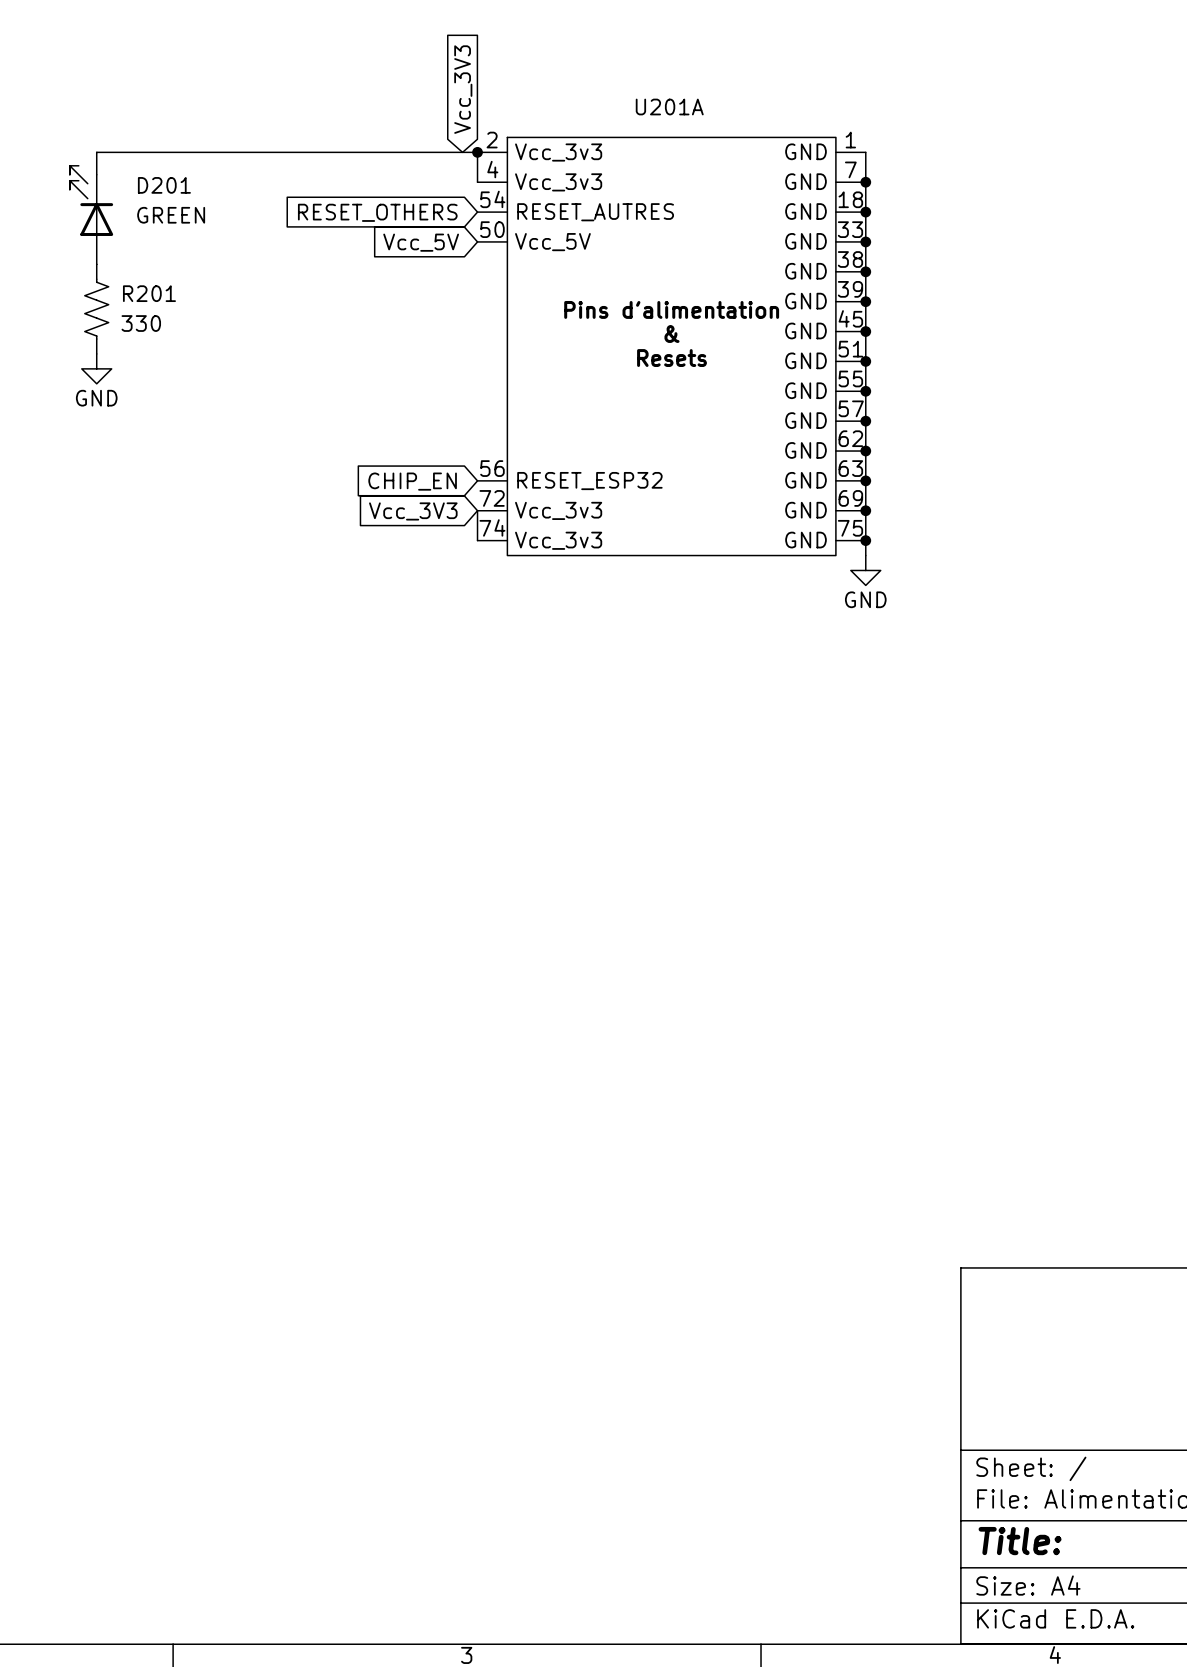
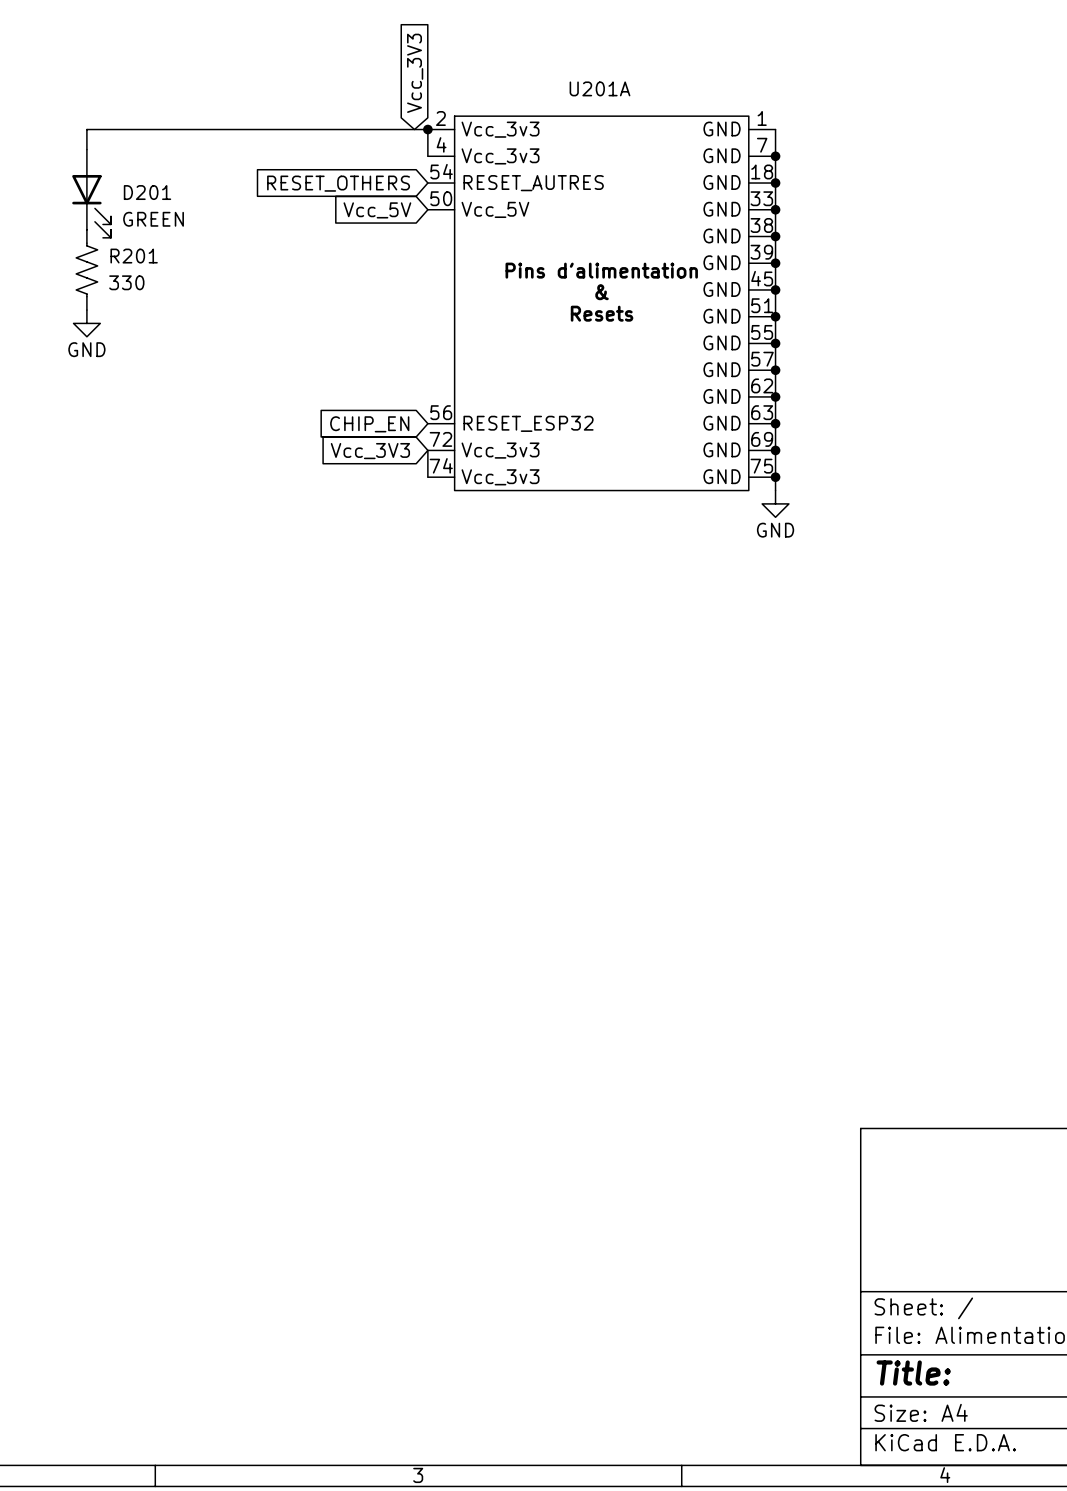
D201 name position: D201 (164, 185) -> D201 (147, 192)
D201 rotation: 0° (91, 200) -> 180° (91, 206)
D201 value position: GREEN (171, 215) -> GREEN (153, 219)

